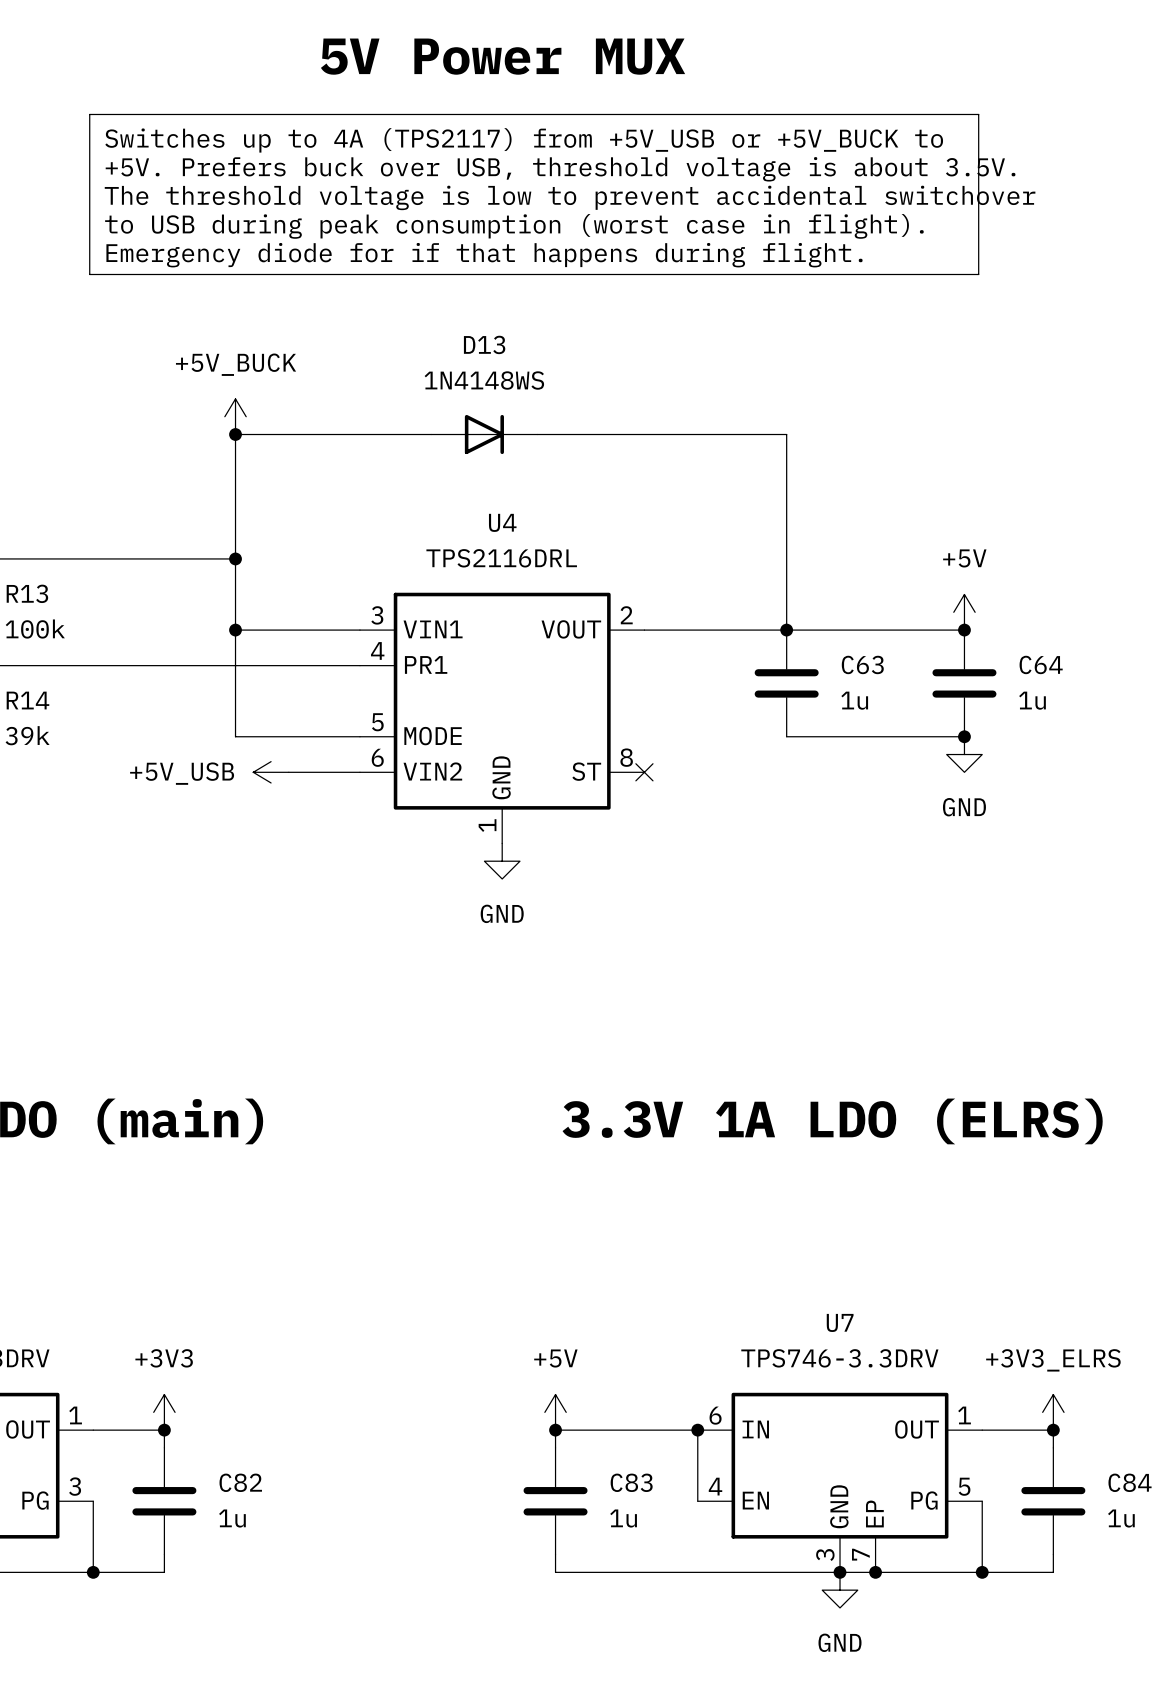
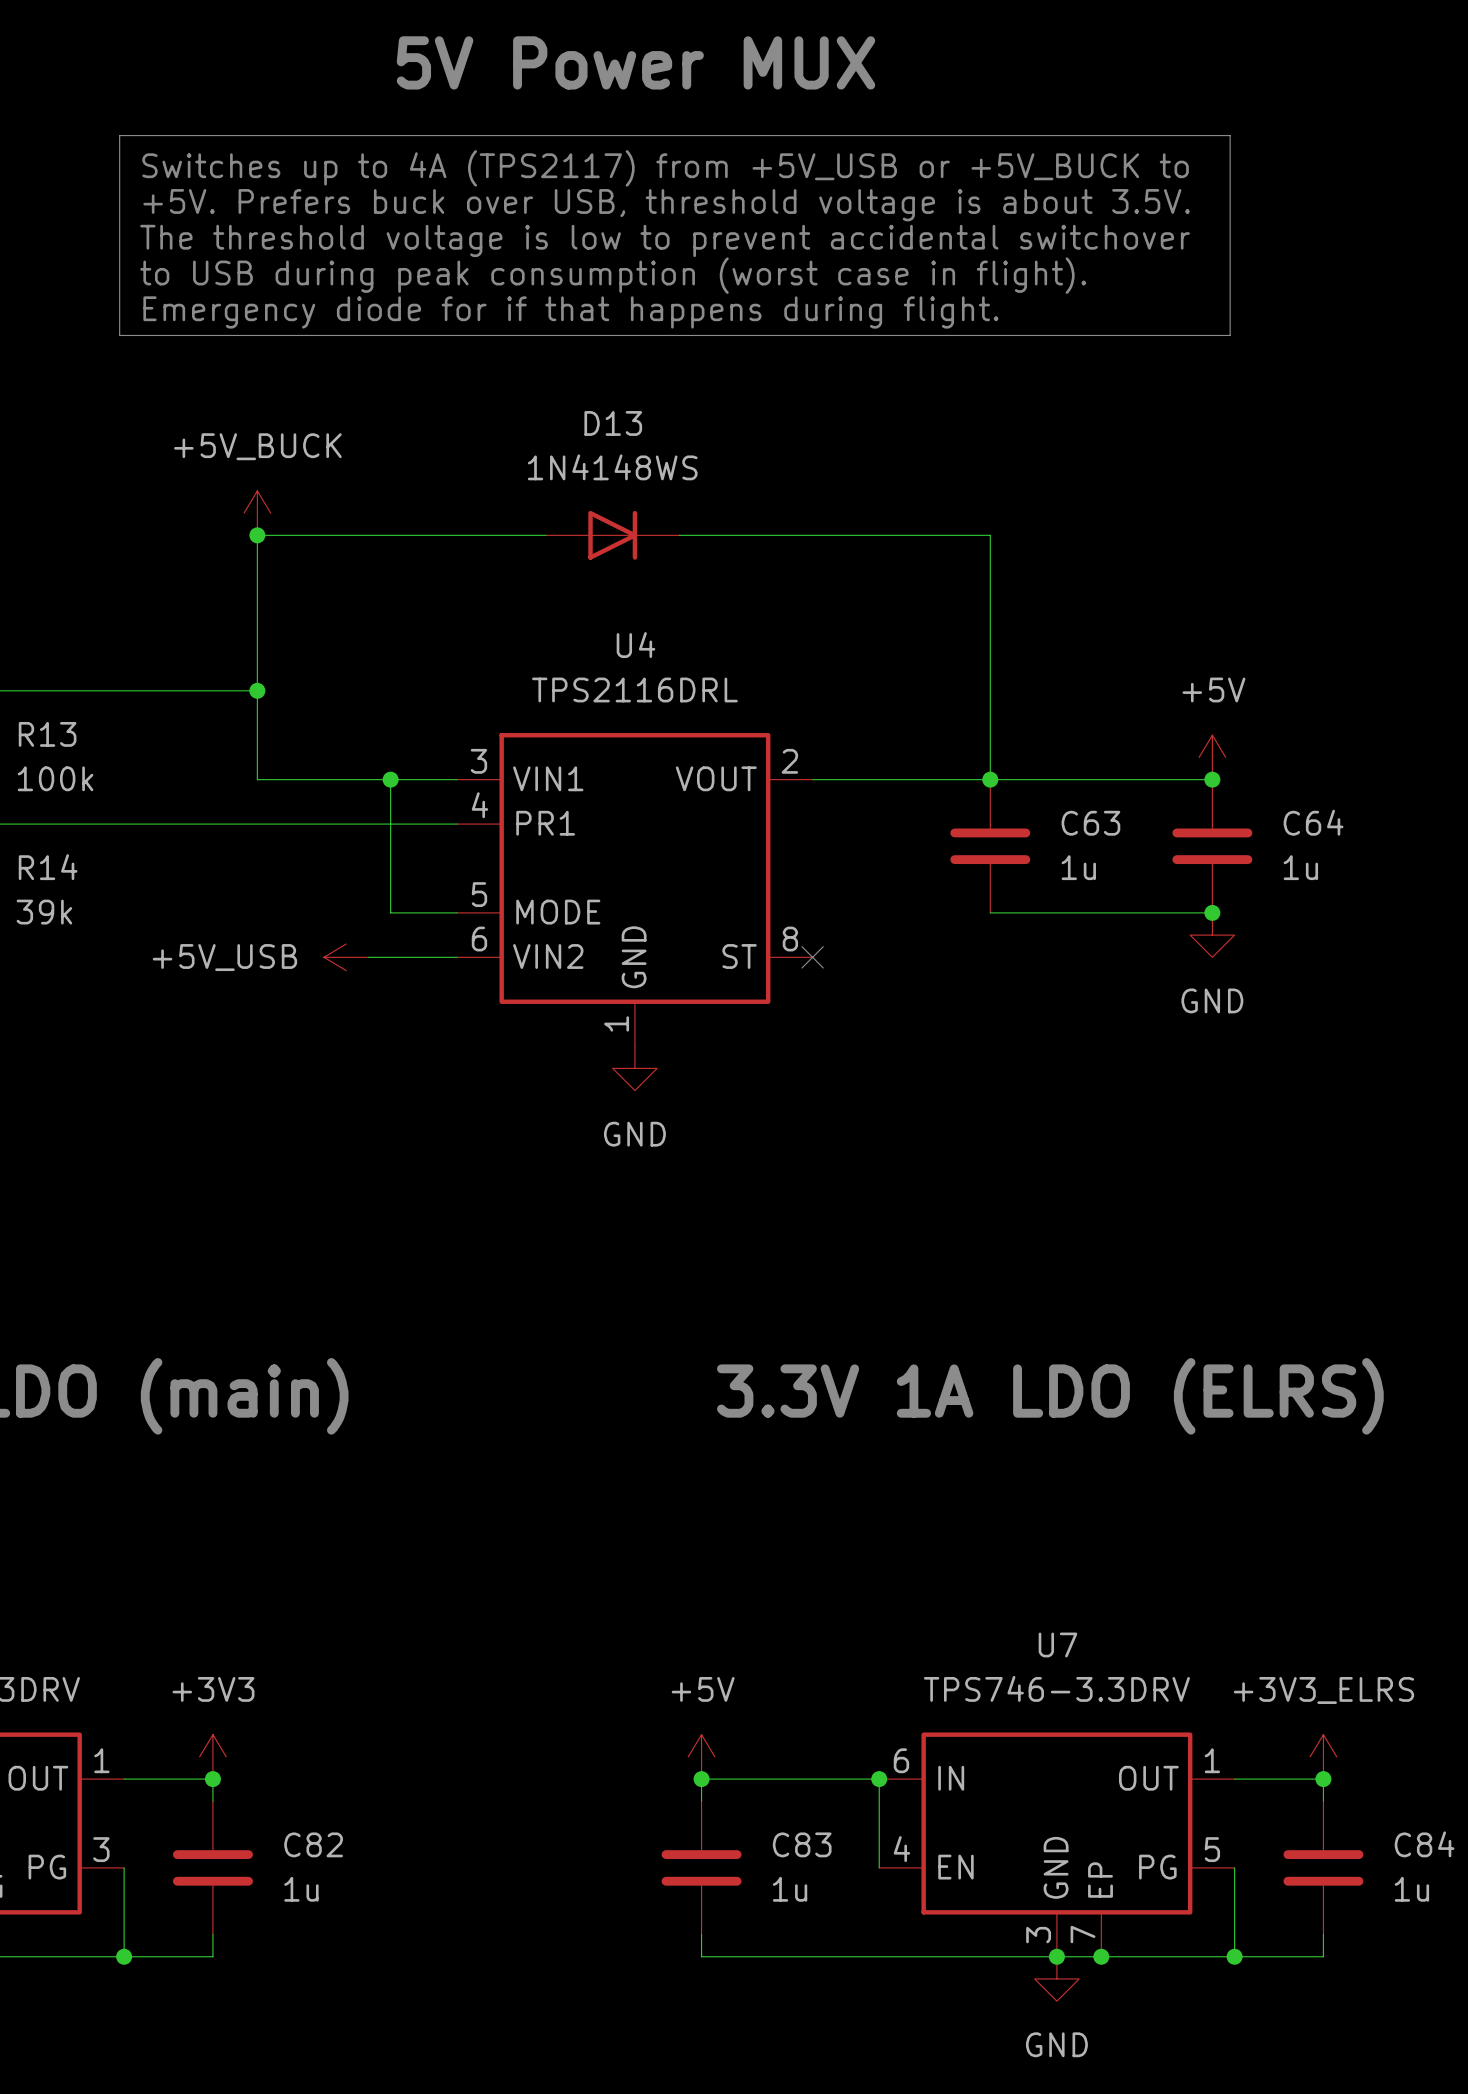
power symbol position: +5V_BUCK (235, 416) -> +5V_BUCK (257, 513)
wire: (235, 434) (235, 736) (306, 736) -> (301, 535) (257, 535) (257, 779) (301, 779)
junction position: (235, 434) -> (257, 535)
wire: (199, 558) (235, 558) -> none
junction position: (235, 558) -> (257, 690)
junction: (235, 630) -> none
wire: none -> (390, 779) (390, 912)
junction: none -> (390, 779)

